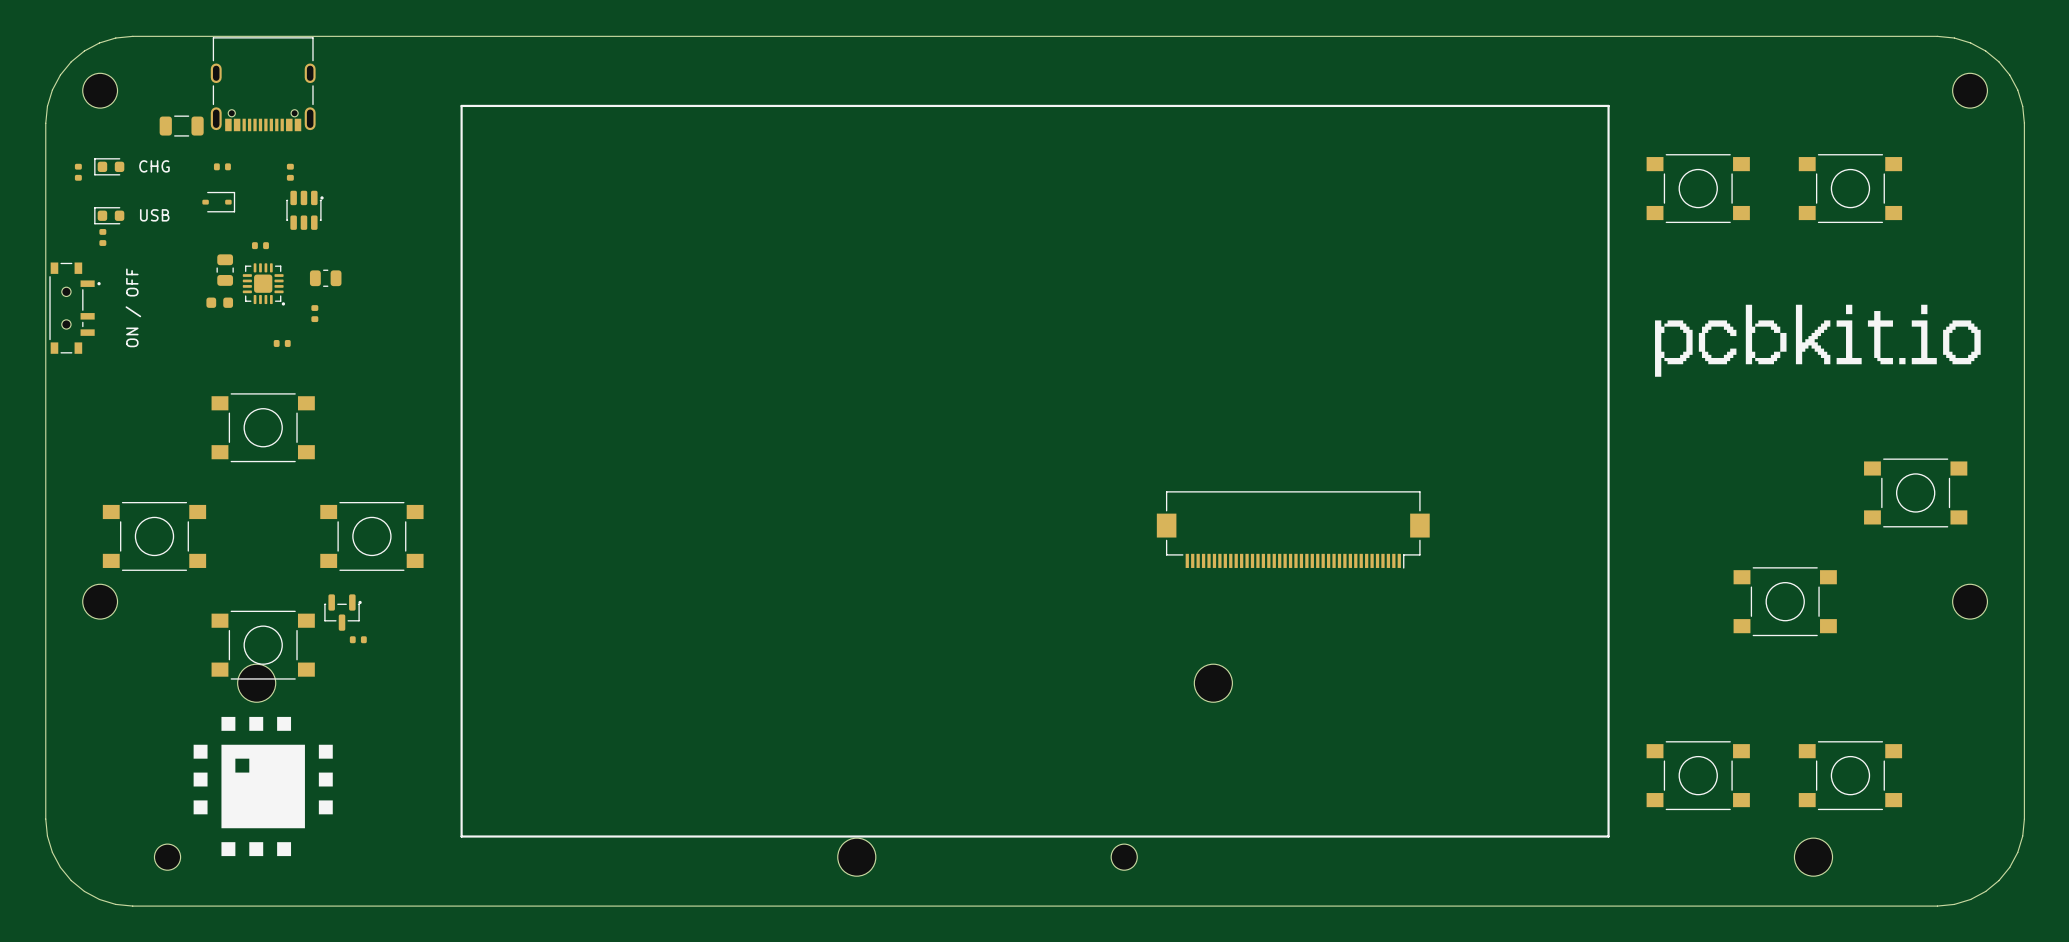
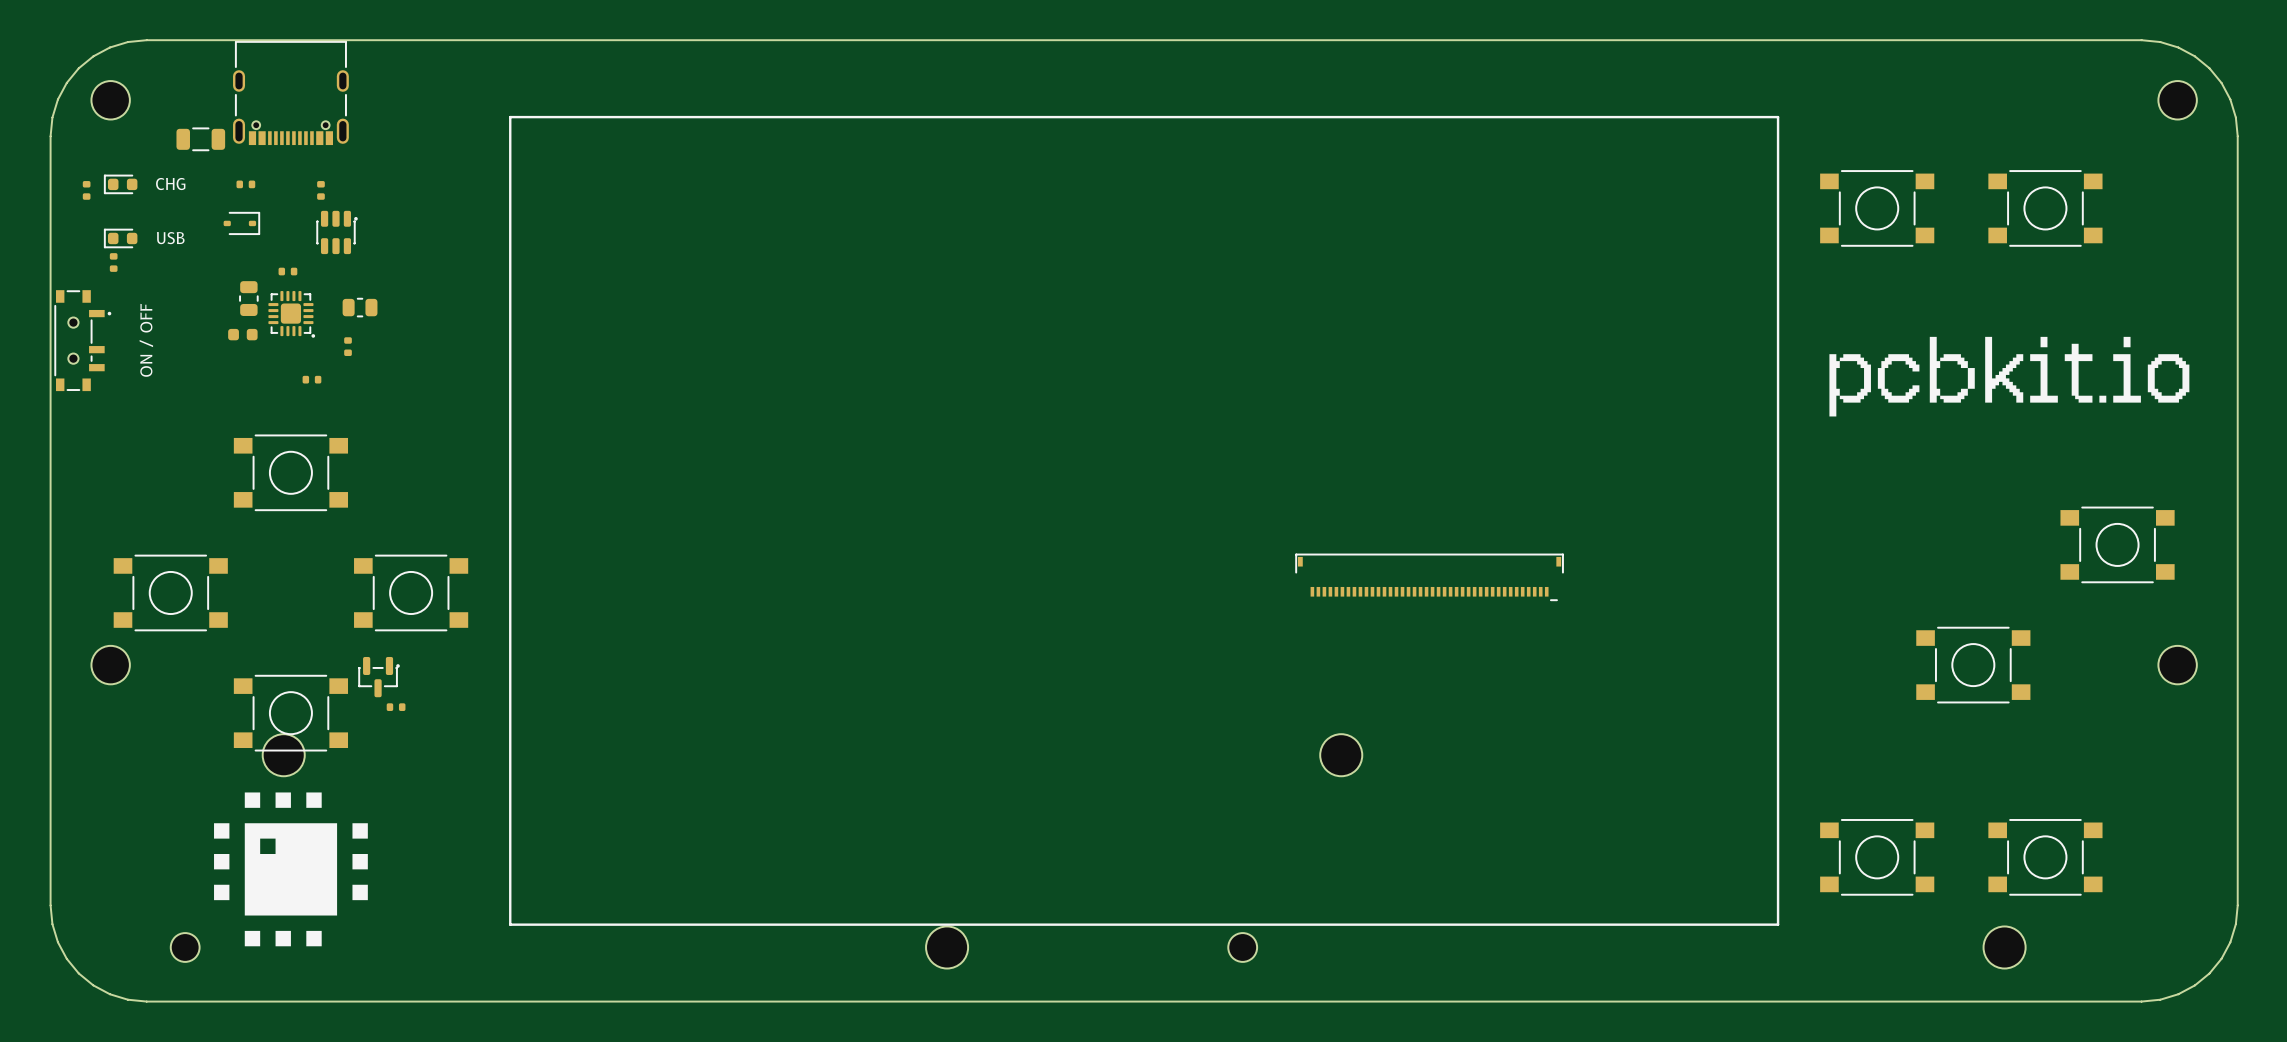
part footprint: [1156, 491, 1430, 569] -> [1295, 553, 1564, 601]

